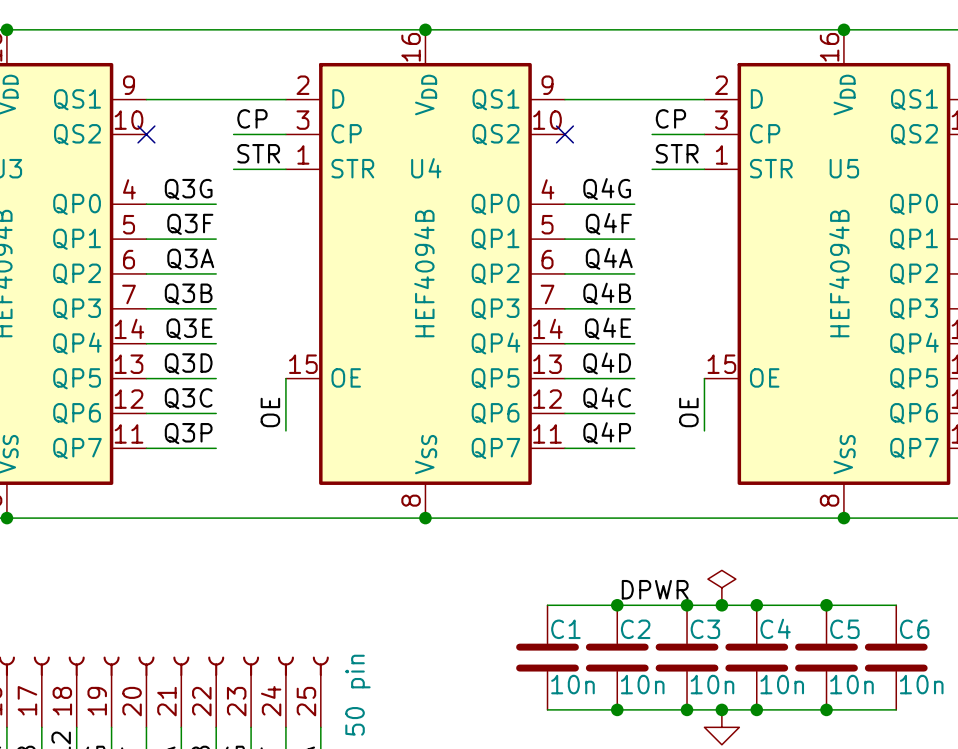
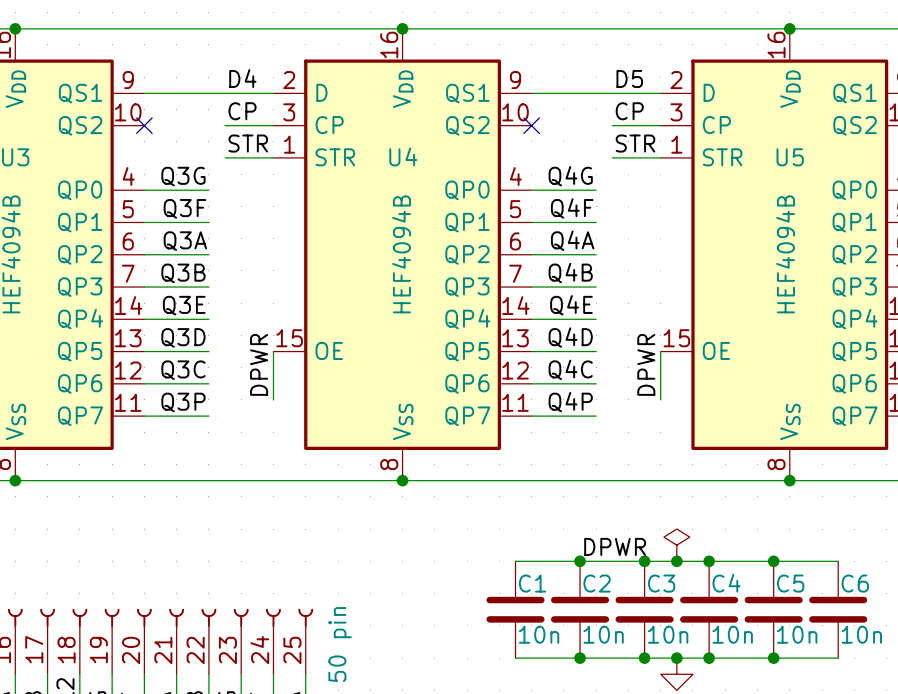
label: none -> D4 (242, 78)
label: none -> D5 (629, 79)
label: OE (270, 412) -> DPWR (259, 364)
label: OE (688, 412) -> DPWR (646, 364)

